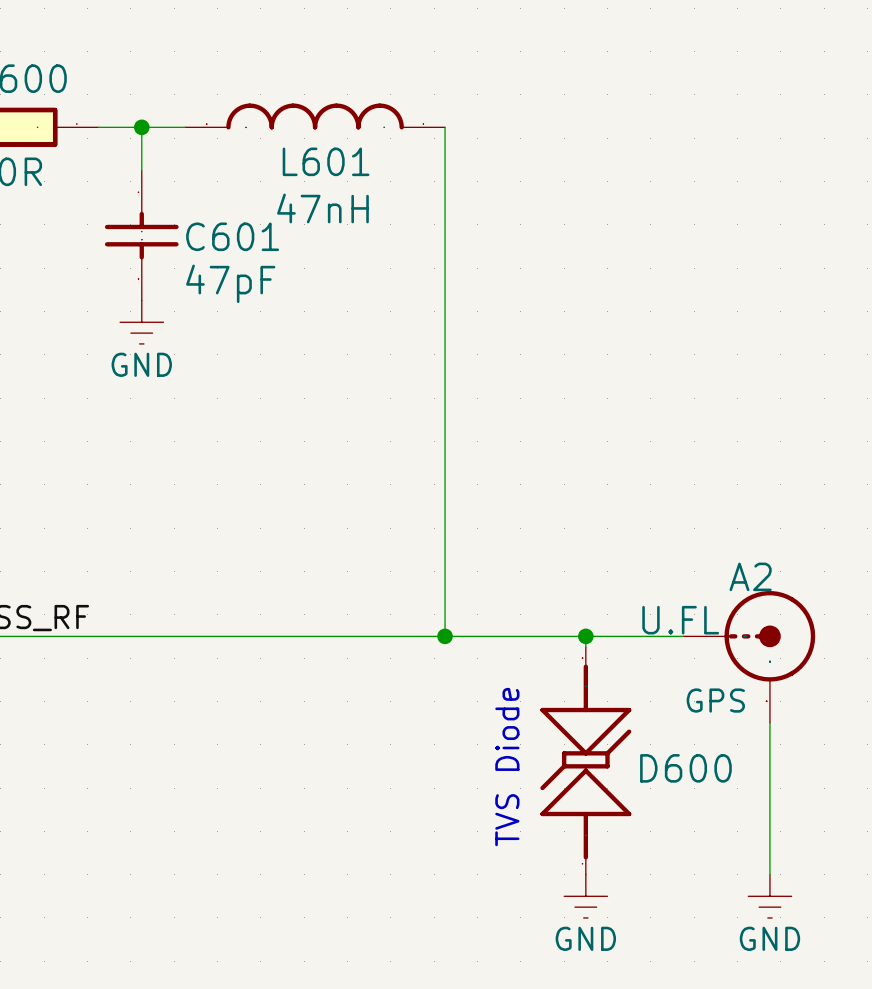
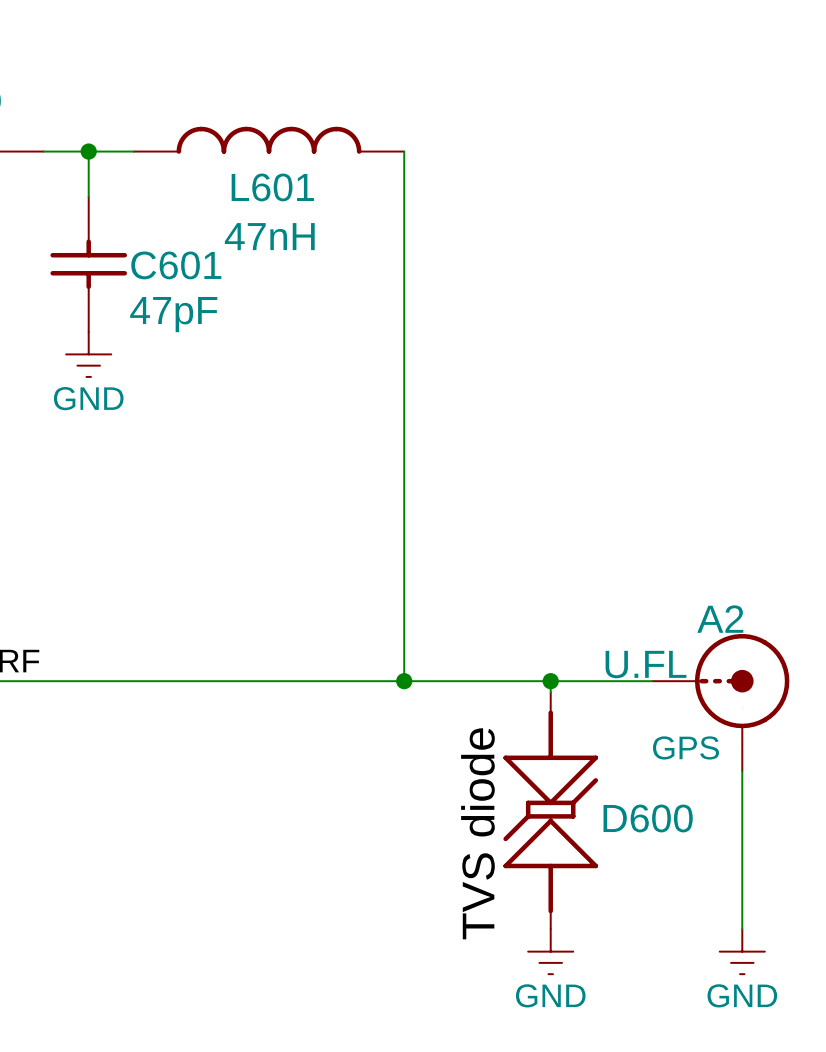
text: TVS Diode (507, 767) -> none
label: none -> TVS diode (477, 833)

